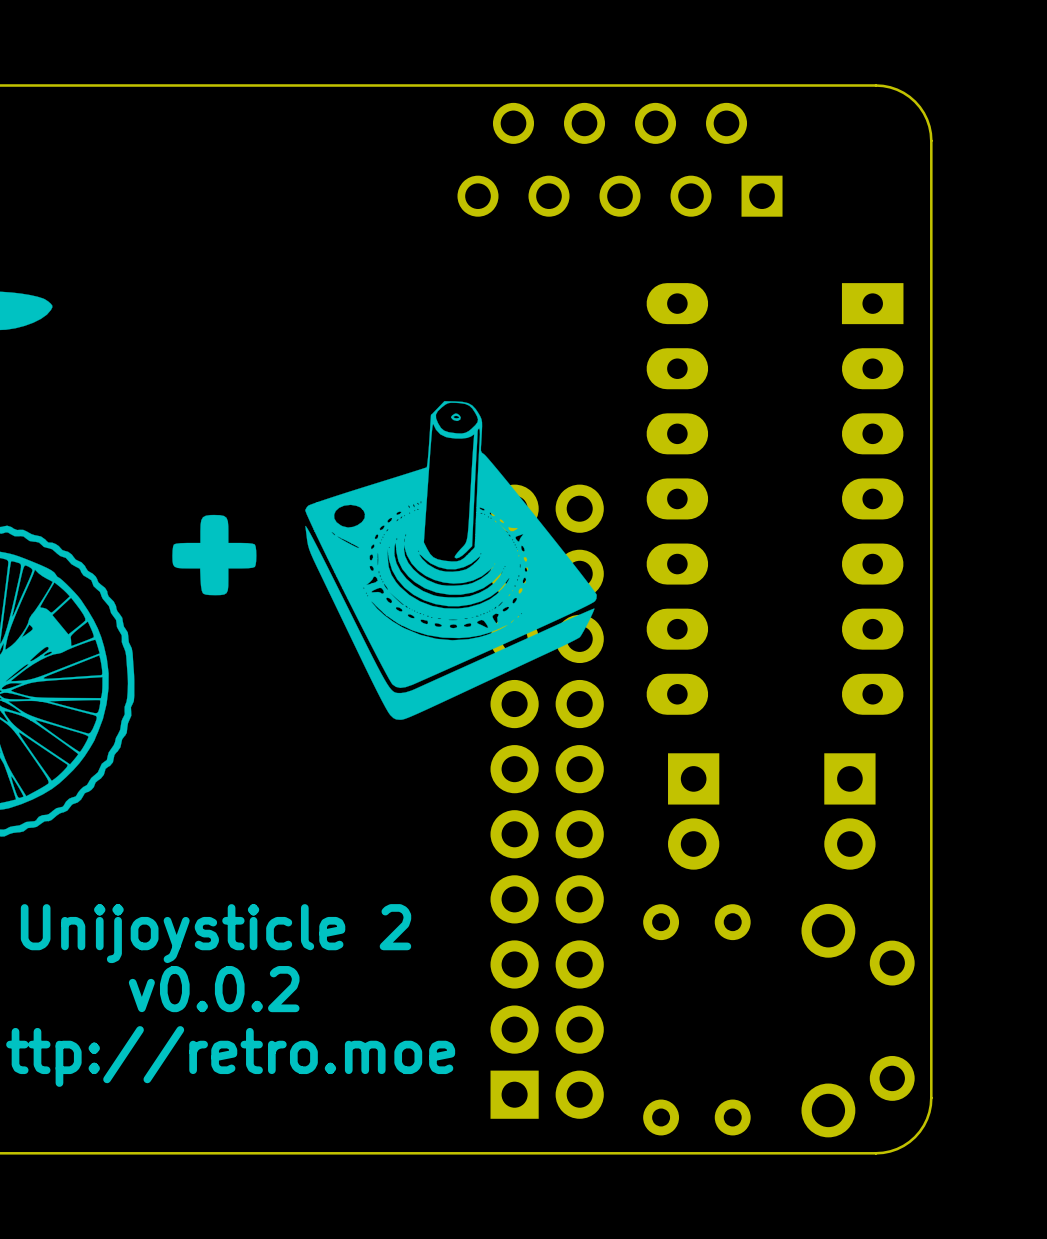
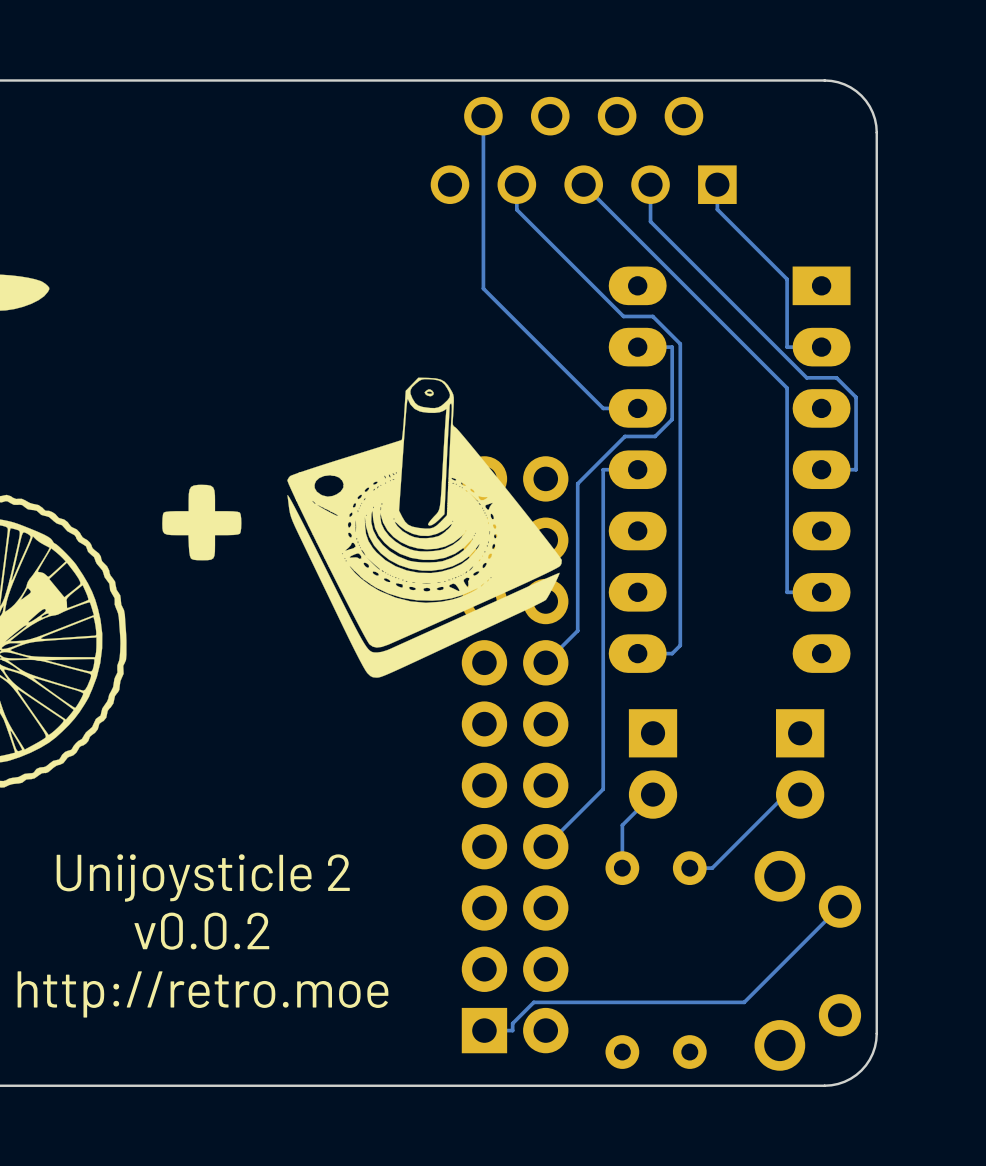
track: none -> (483, 116) (483, 288) (603, 408) (637, 408)
track: none -> (516, 184) (516, 209) (623, 316) (652, 316) (680, 343) (680, 645) (672, 653) (637, 653)
track: none -> (583, 184) (787, 388) (787, 592) (821, 592)
track: none -> (650, 184) (650, 221) (806, 377) (836, 377) (856, 397) (856, 469) (821, 469)
track: none -> (717, 184) (717, 209) (787, 279) (787, 347) (821, 347)
track: none -> (637, 347) (672, 347) (672, 419) (655, 436) (625, 436) (577, 483) (577, 630) (545, 662)
track: none -> (637, 469) (603, 469) (603, 789) (545, 846)
track: none -> (653, 794) (622, 825) (622, 868)
track: none -> (800, 794) (785, 794) (712, 868) (689, 868)
track: none -> (839, 906) (744, 1002) (533, 1002) (512, 1023) (512, 1030) (484, 1030)

